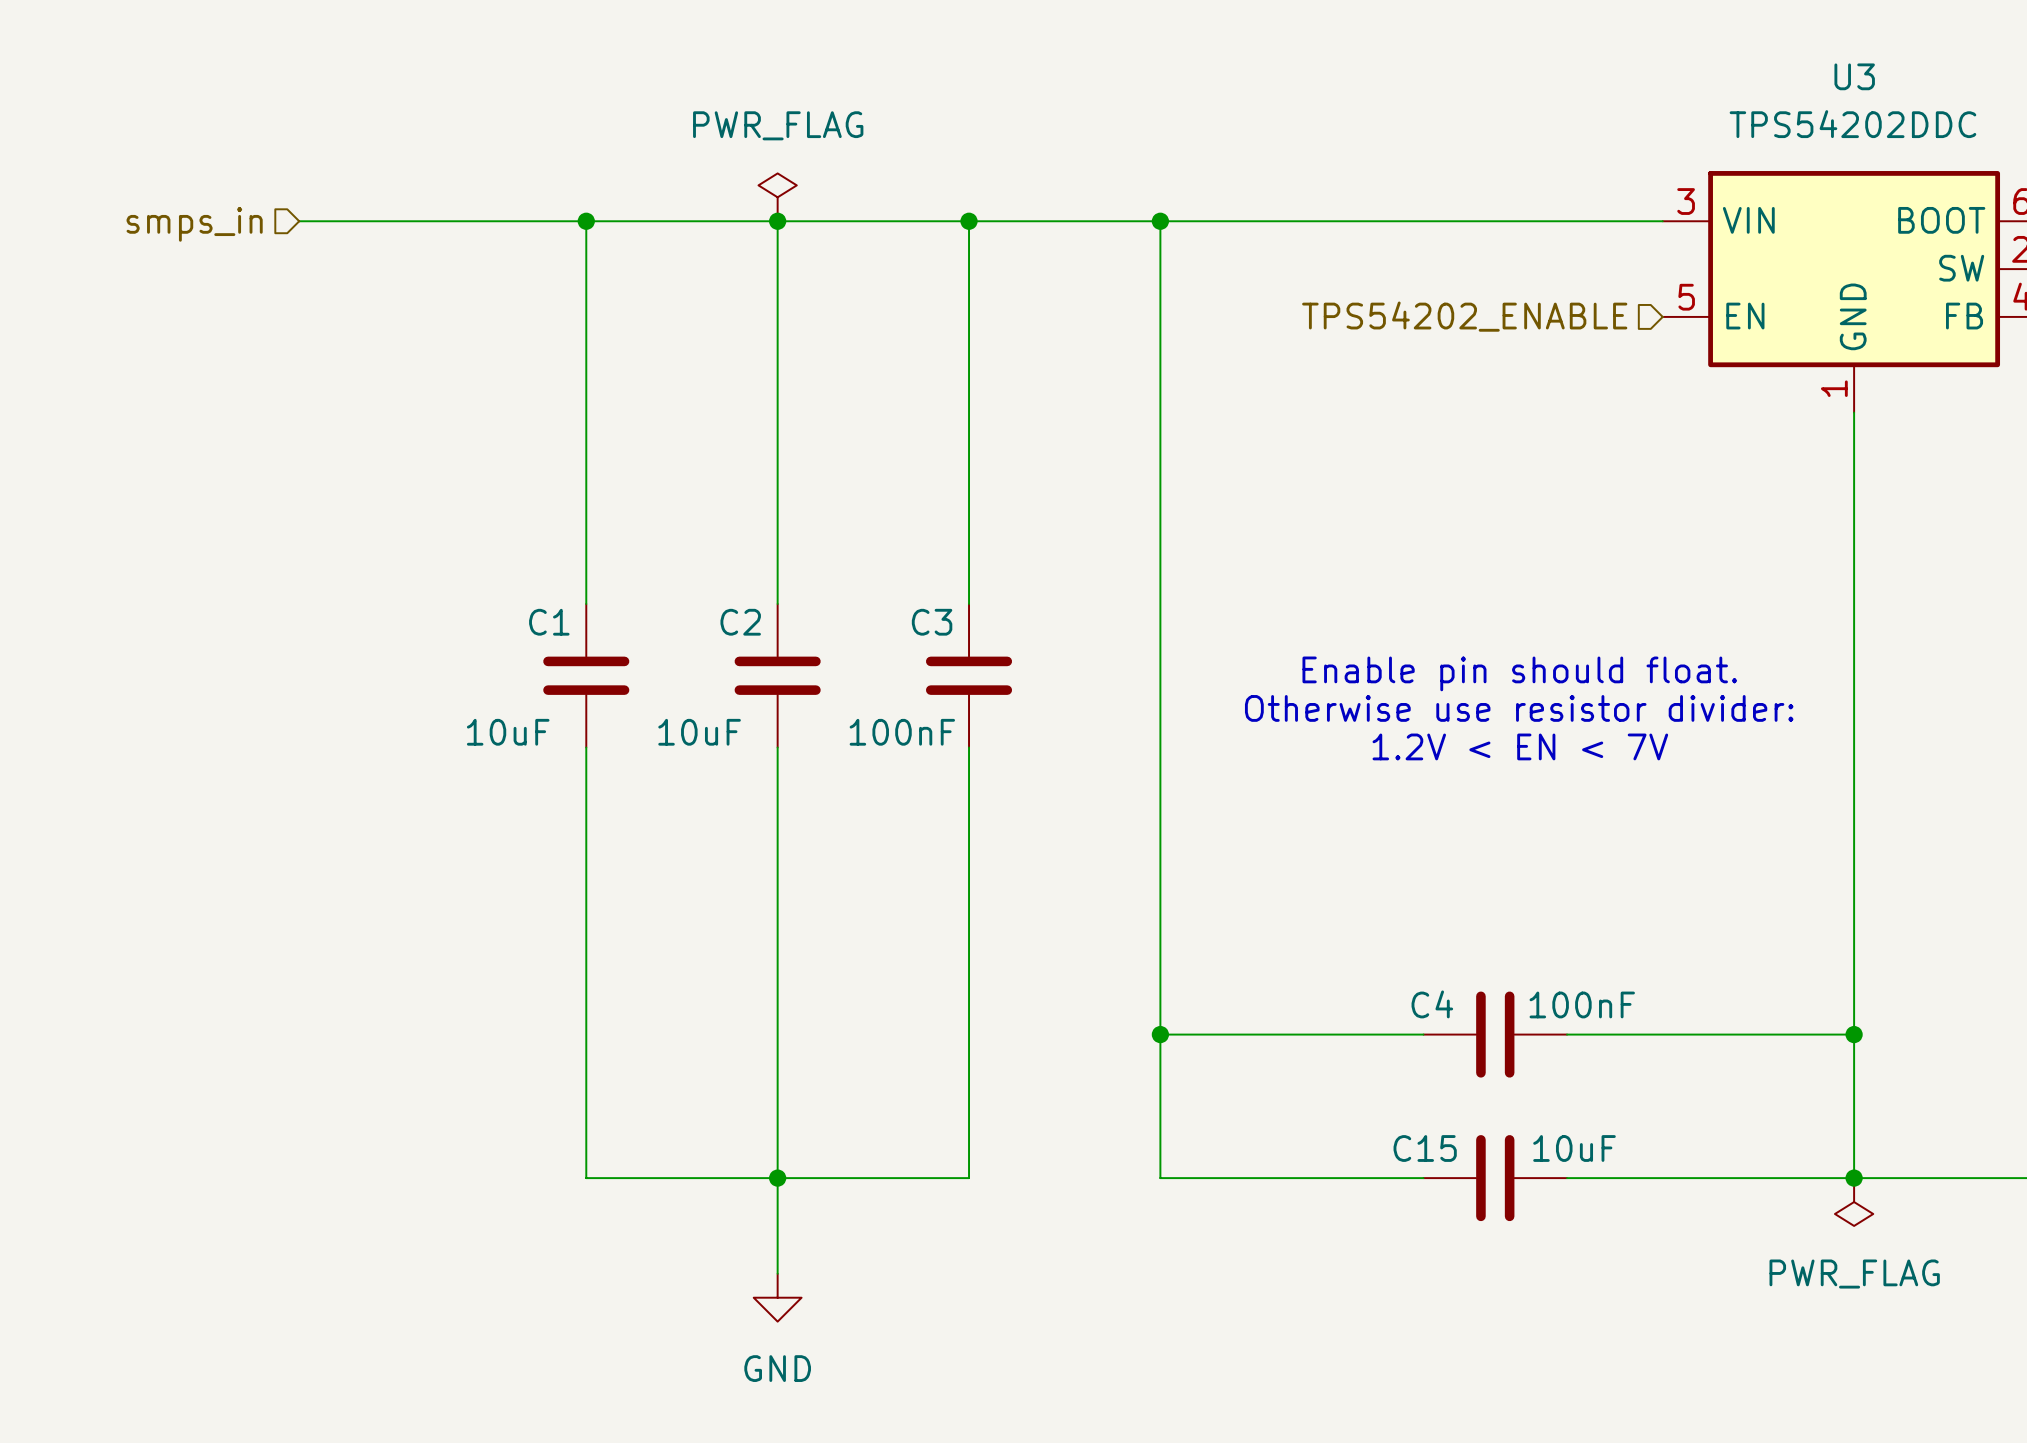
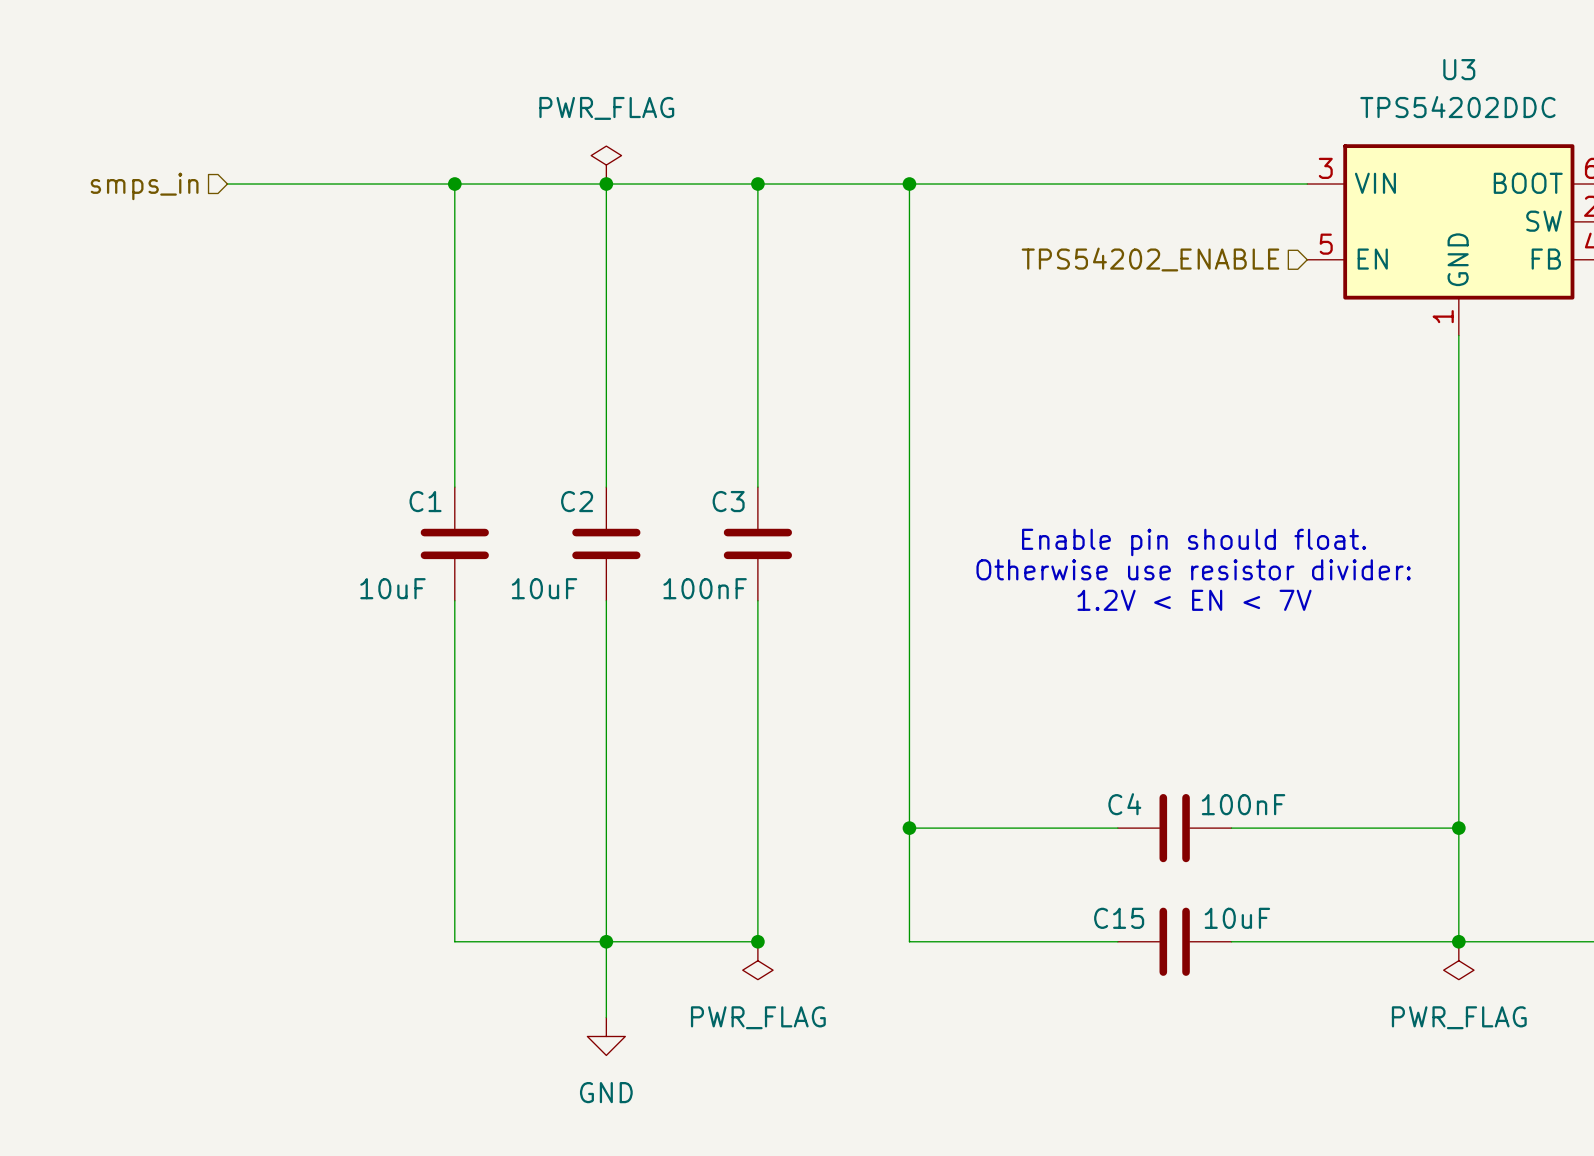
junction: none -> (757, 941)
power symbol: none -> PWR_FLAG (757, 960)

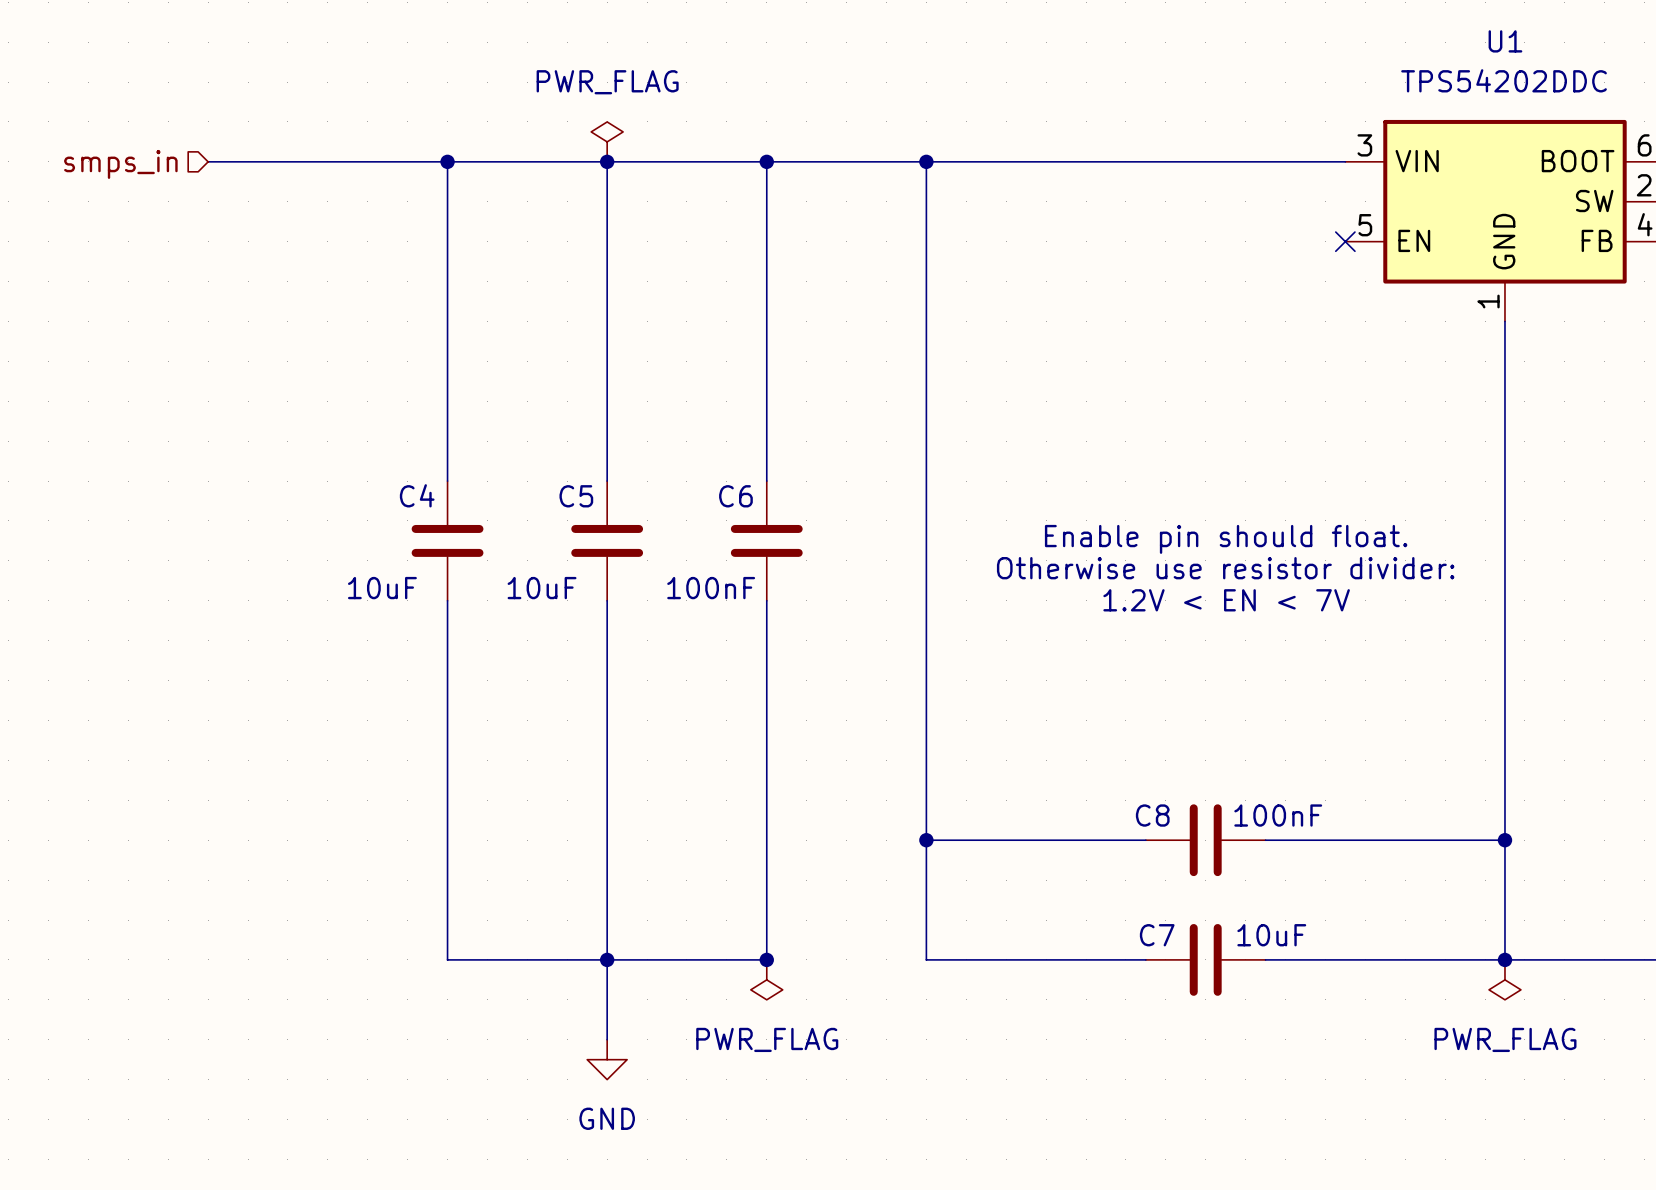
U3 name: U3 (1459, 69) -> U1 (1505, 41)
hierarchical label: TPS54202_ENABLE (1150, 259) -> none
no-connect mark: none -> (1345, 241)
C1 name: C1 (425, 501) -> C4 (417, 495)
C2 name: C2 (577, 501) -> C5 (576, 496)
C3 name: C3 (728, 501) -> C6 (735, 496)
C4 name: C4 (1124, 804) -> C8 (1152, 815)
C15 name: C15 (1119, 918) -> C7 (1157, 935)

